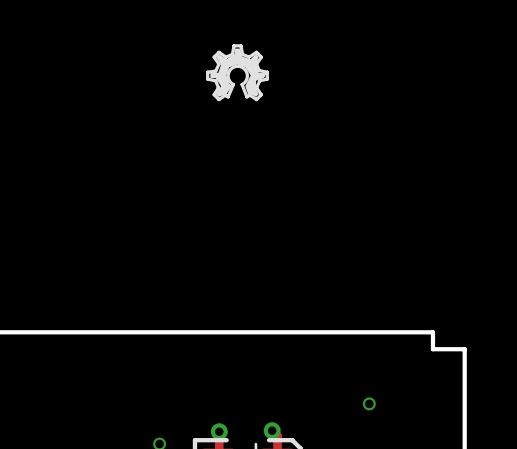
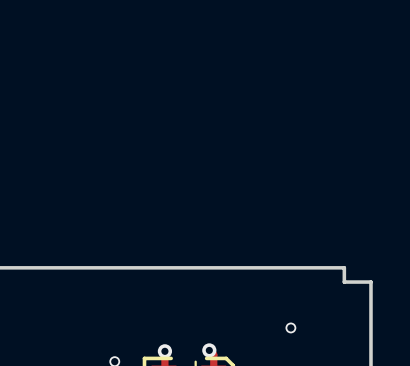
drawing: [206, 44, 269, 102] -> none

